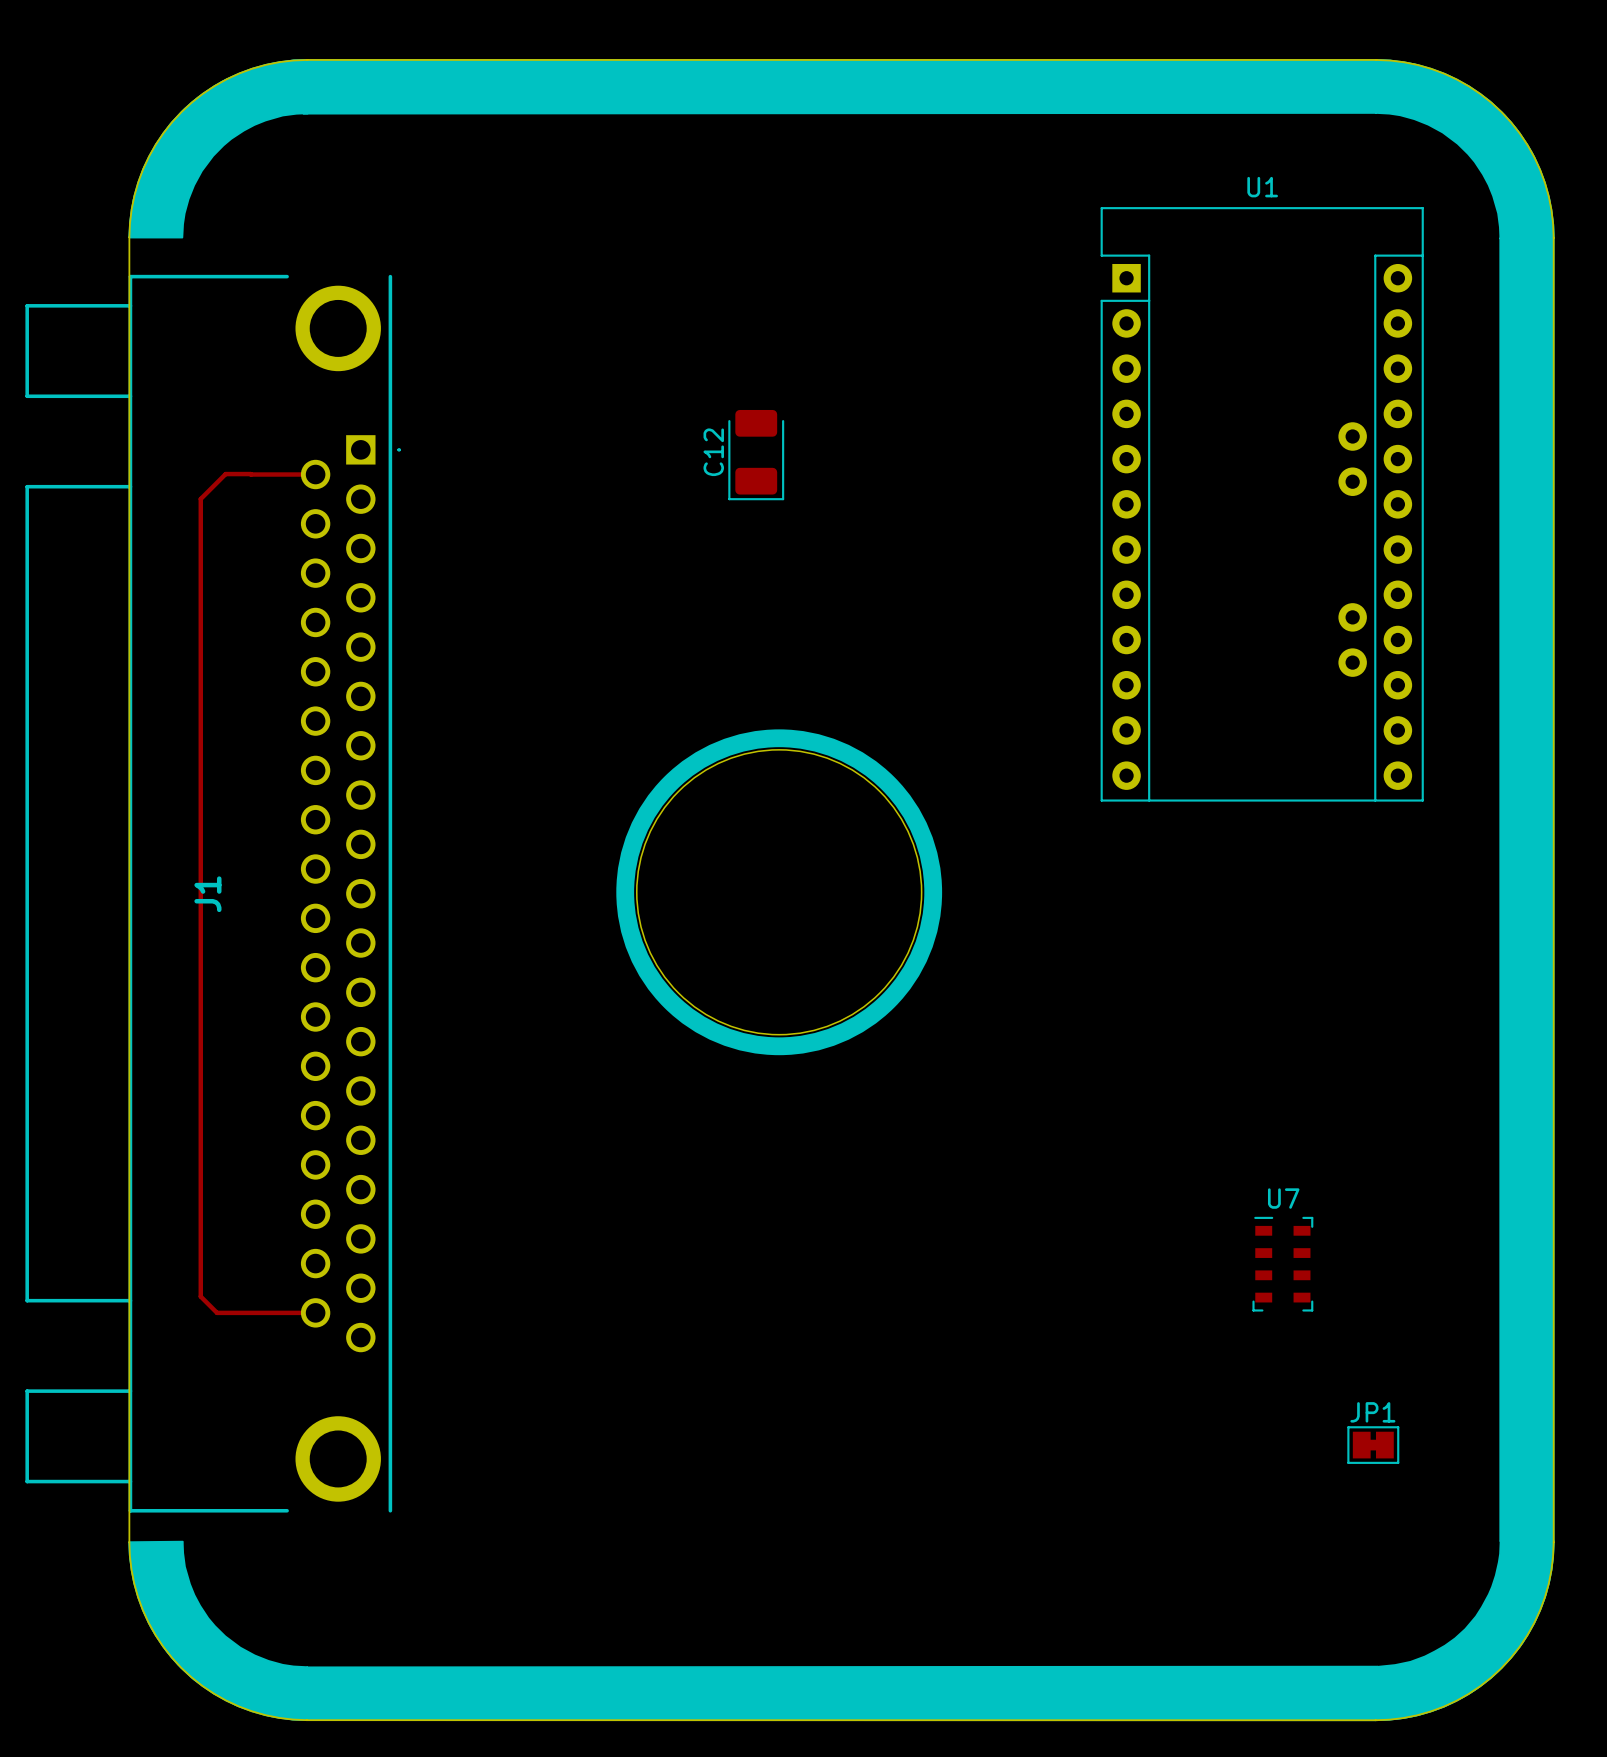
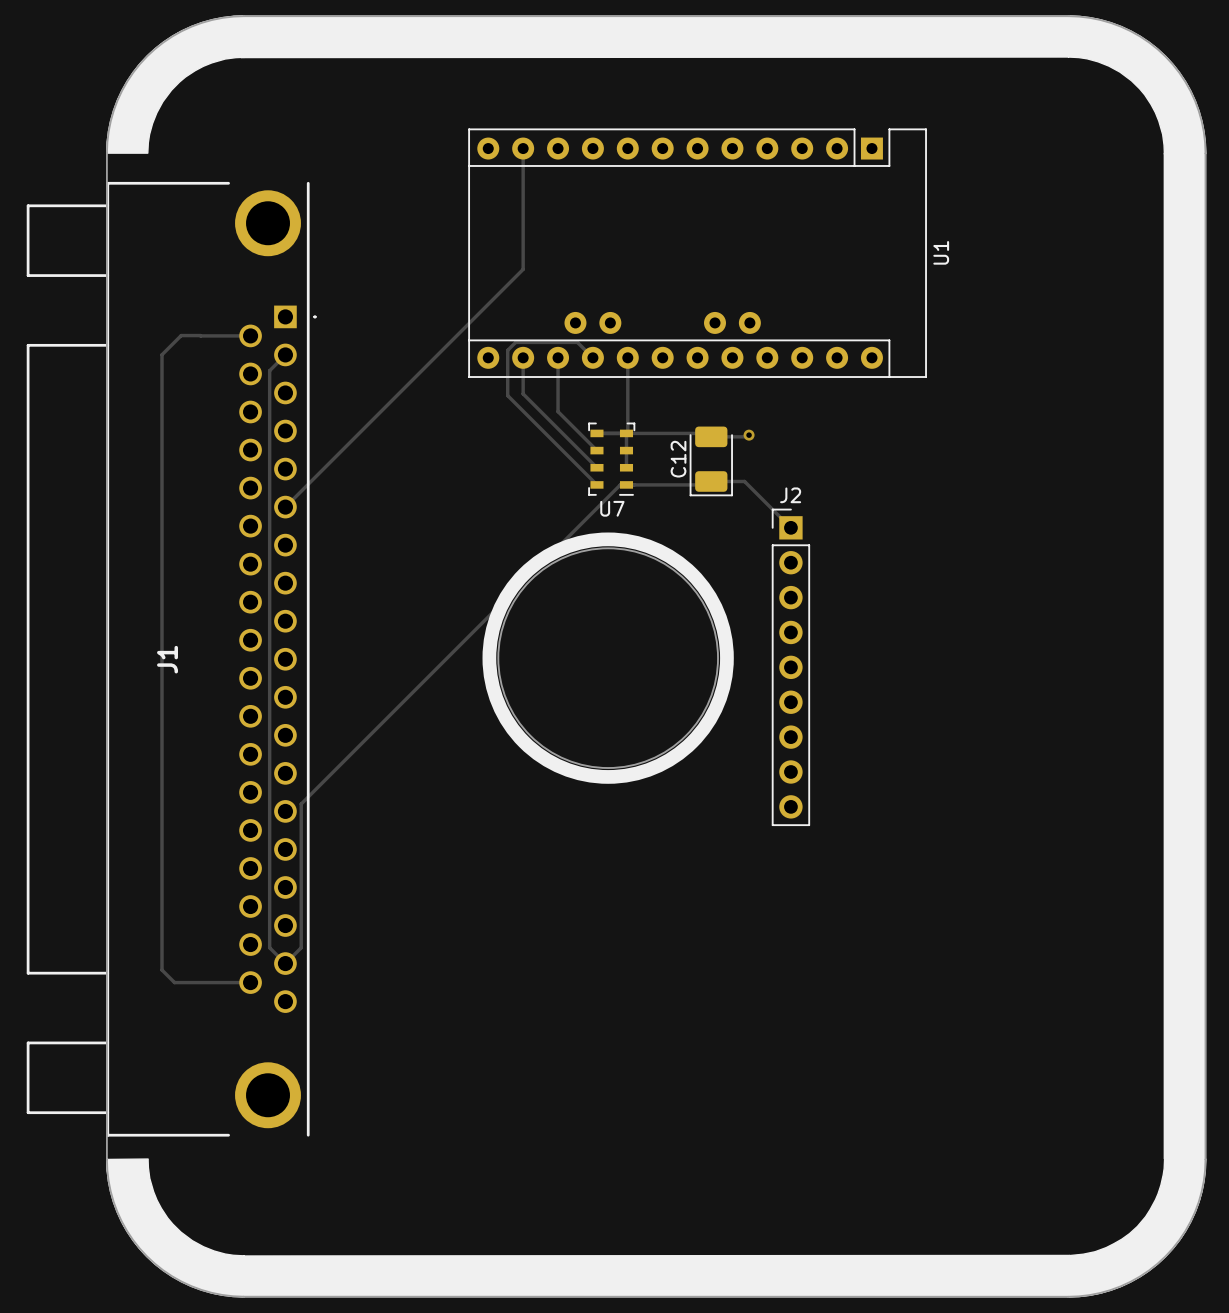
track: none -> (523, 148) (523, 269) (285, 507)
C12 position: (756, 455) -> (711, 461)
track: none -> (285, 354) (269, 370) (269, 947) (285, 963) (301, 947) (301, 804) (620, 484) (707, 484) (711, 481) (744, 481) (790, 527)
track: none -> (523, 357) (523, 393) (596, 467)
track: none -> (558, 357) (558, 411) (596, 450)
track: none -> (592, 357) (577, 342) (515, 342) (507, 350) (507, 395) (596, 484)
track: none -> (627, 357) (626, 467)
U1 rotation: 0° (1262, 504) -> 90° clockwise (697, 253)
U1 position: (1262, 504) -> (697, 253)
track: none -> (596, 433) (707, 433) (711, 436) (747, 436) (749, 435)
via: none -> (749, 435)
J2: none -> (790, 667)
U7 rotation: 0° (1282, 1264) -> 180° (611, 459)
U7 position: (1282, 1264) -> (611, 459)
JP1: (1373, 1445) -> none

